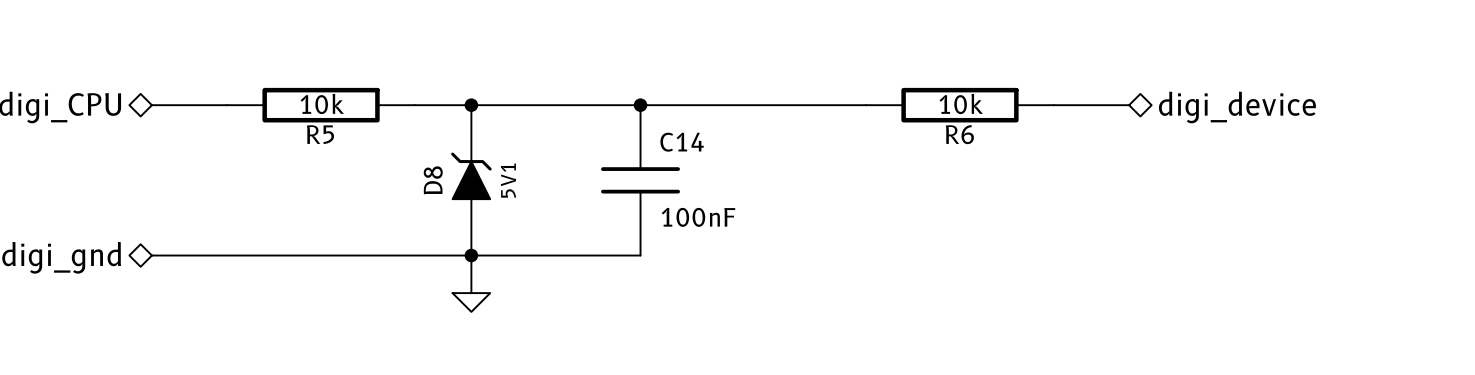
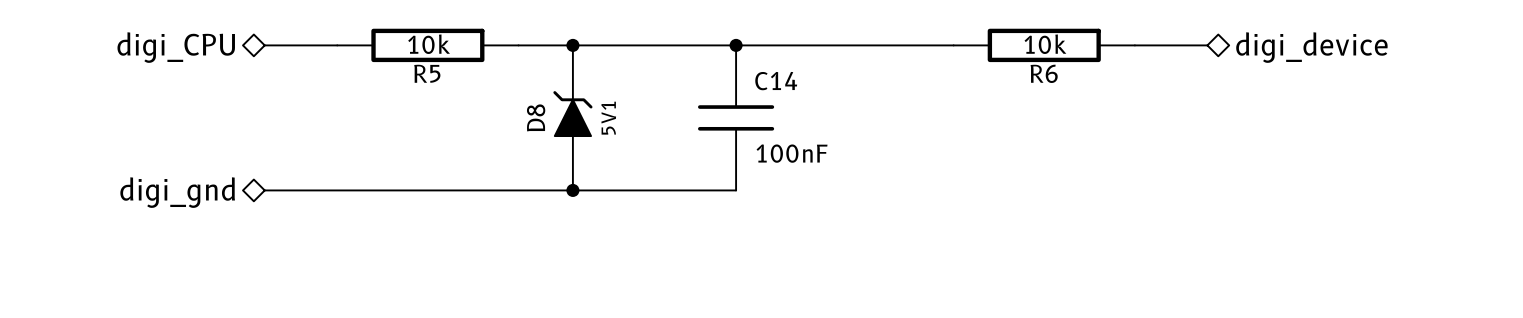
wire: (471, 255) (471, 293) -> none
power symbol: (471, 302) -> none

